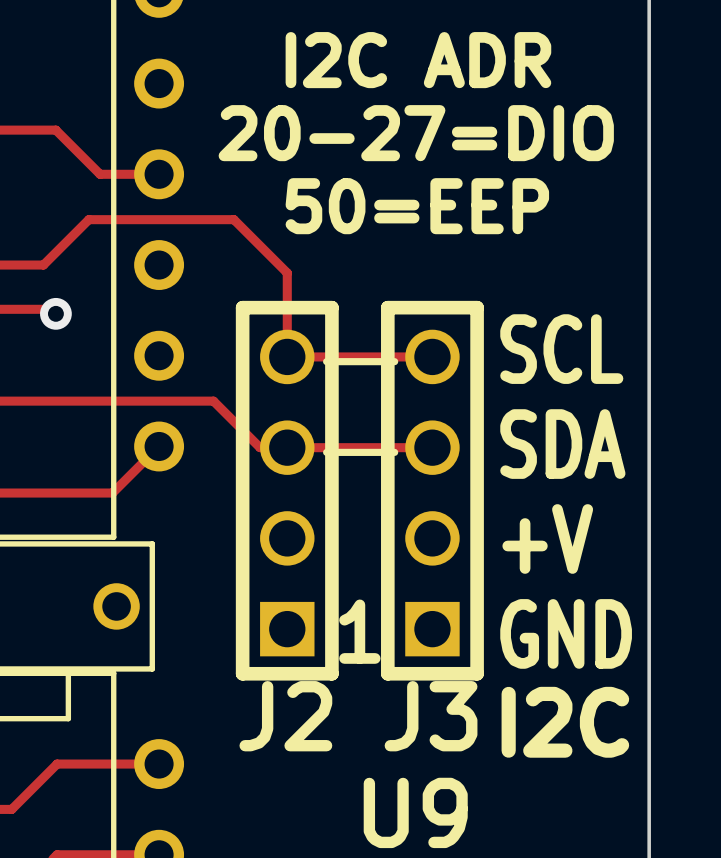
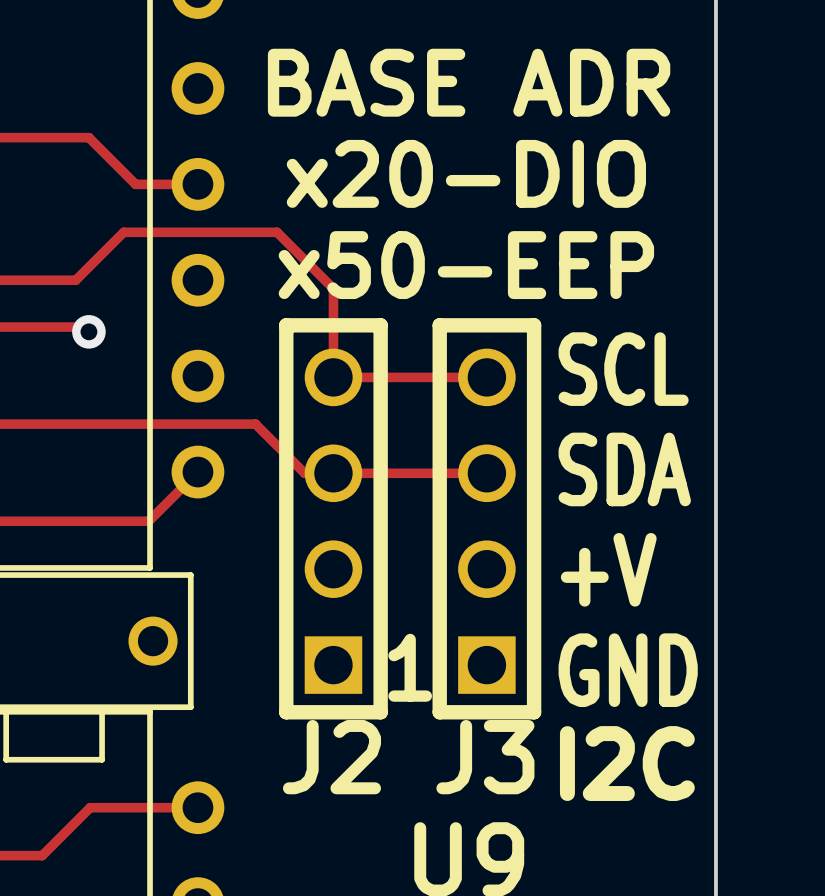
text: I2C ADR (418, 60) -> BASE ADR (469, 82)
text: 20-27=DIO (416, 133) -> x20-DIO (466, 173)
text: 50=EEP (417, 206) -> x50-EEP (466, 265)
line: (326, 361) (394, 361) -> none
line: (326, 452) (394, 452) -> none

